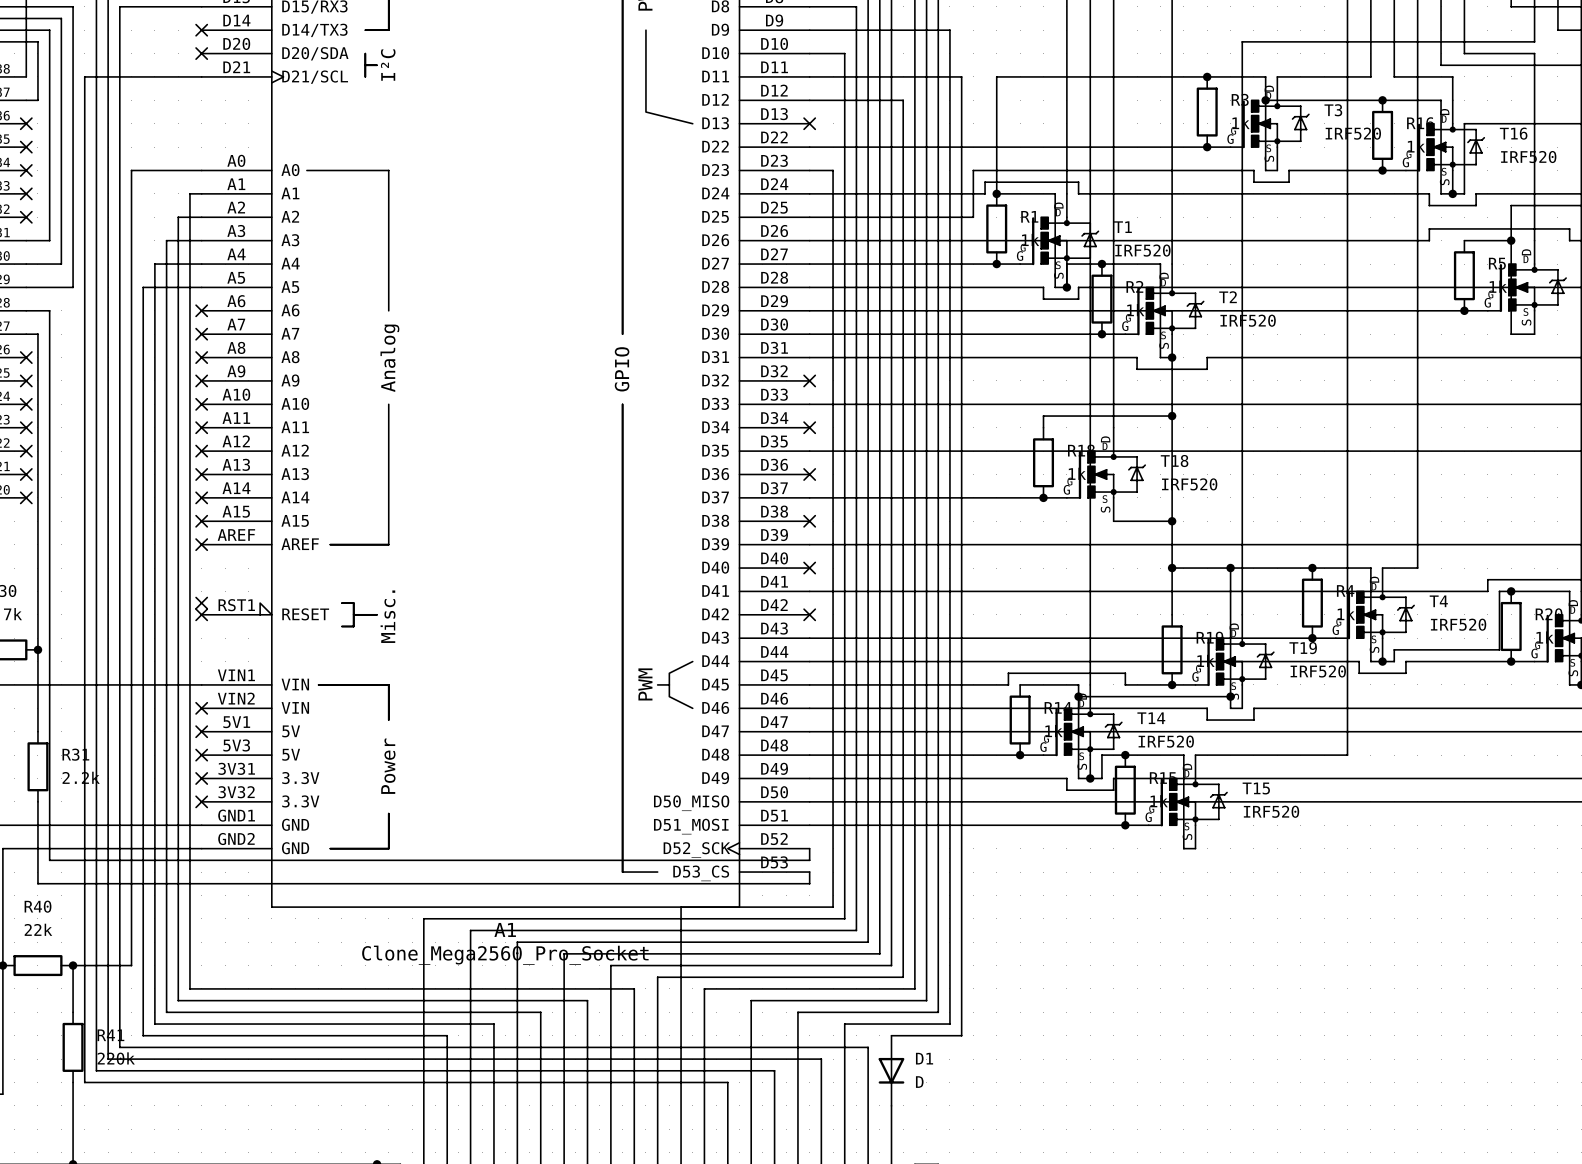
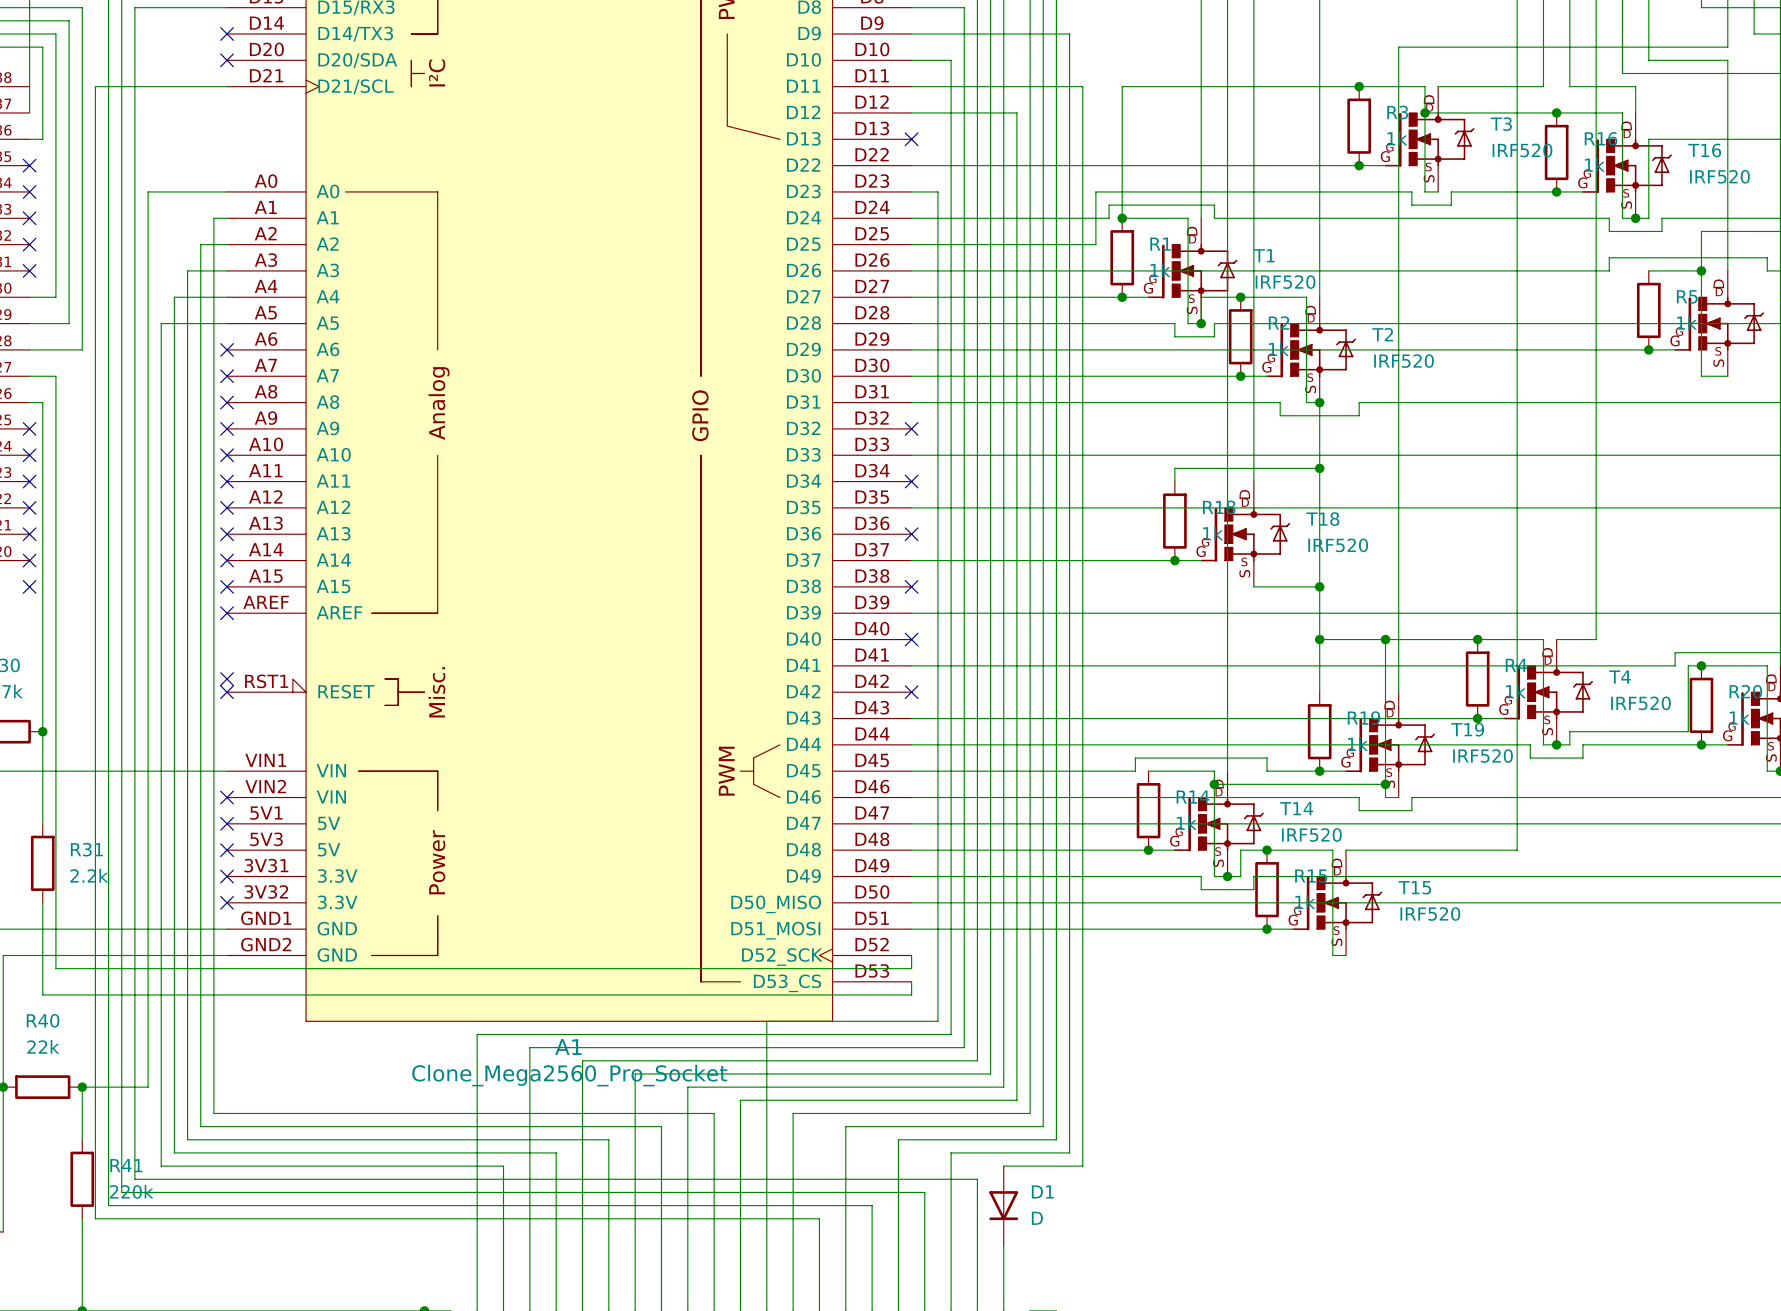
wire: none -> (29, 86) (29, 112)
wire: (26, 100) (37, 100) -> (29, 139) (42, 139) (42, 112)
no-connect mark: (26, 123) -> none
wire: (26, 240) (49, 240) -> none
no-connect mark: none -> (29, 270)
wire: (49, 264) (61, 264) -> (55, 297) (55, 270)
wire: (61, 287) (73, 287) -> (55, 349) (82, 349) (82, 323)
wire: (49, 310) (49, 334) -> (69, 297) (69, 323)
wire: (37, 334) (37, 357) -> (42, 376) (55, 376)
wire: none -> (29, 402) (42, 402)
no-connect mark: (26, 357) -> none
no-connect mark: none -> (29, 586)

